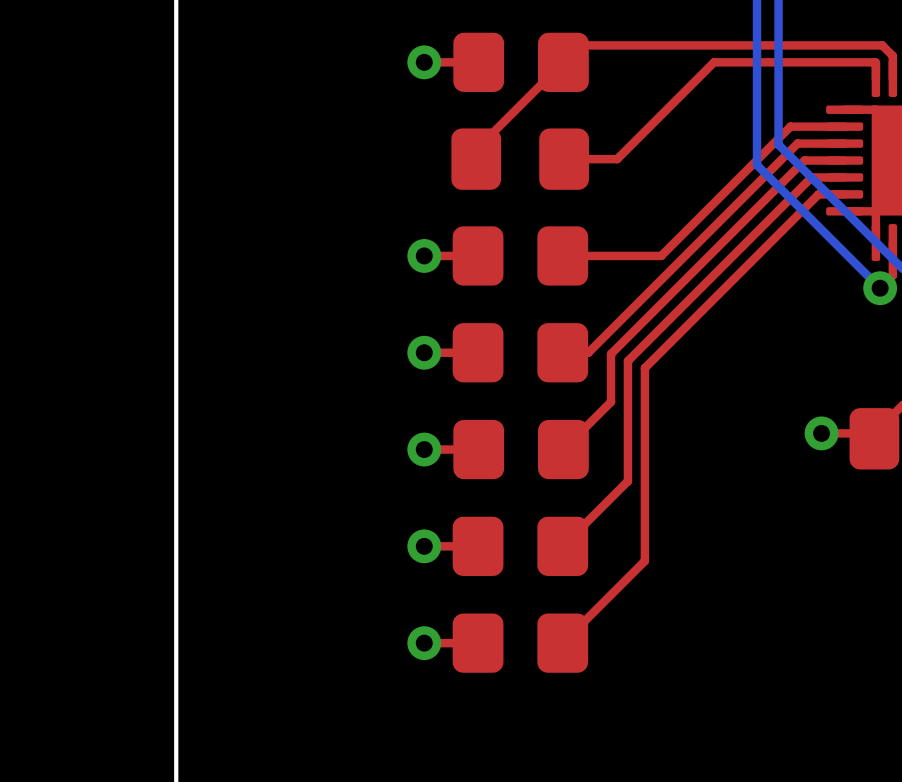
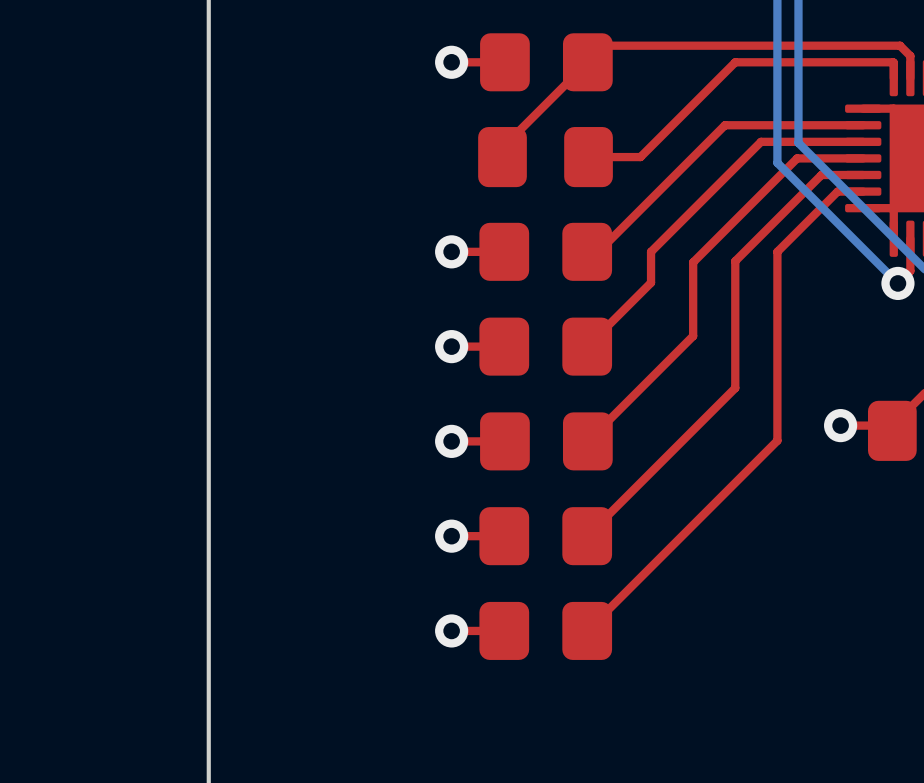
top track: (790, 126) (661, 255) (574, 255) -> (810, 125) (724, 125) (598, 251)
top track: (797, 143) (588, 352) (562, 352) -> (817, 141) (761, 141) (651, 251) (651, 282) (587, 346)
top track: (804, 160) (611, 354) (611, 401) -> (823, 158) (797, 158) (693, 262) (693, 336)
top track: (811, 177) (627, 361) (627, 481) -> (830, 175) (821, 175) (735, 261) (735, 388) (651, 472)
top track: (757, 255) (670, 341) -> none
top track: (644, 368) (644, 560) -> (777, 251) (777, 440) (667, 550)
top track: none -> (667, 361) (634, 394)

